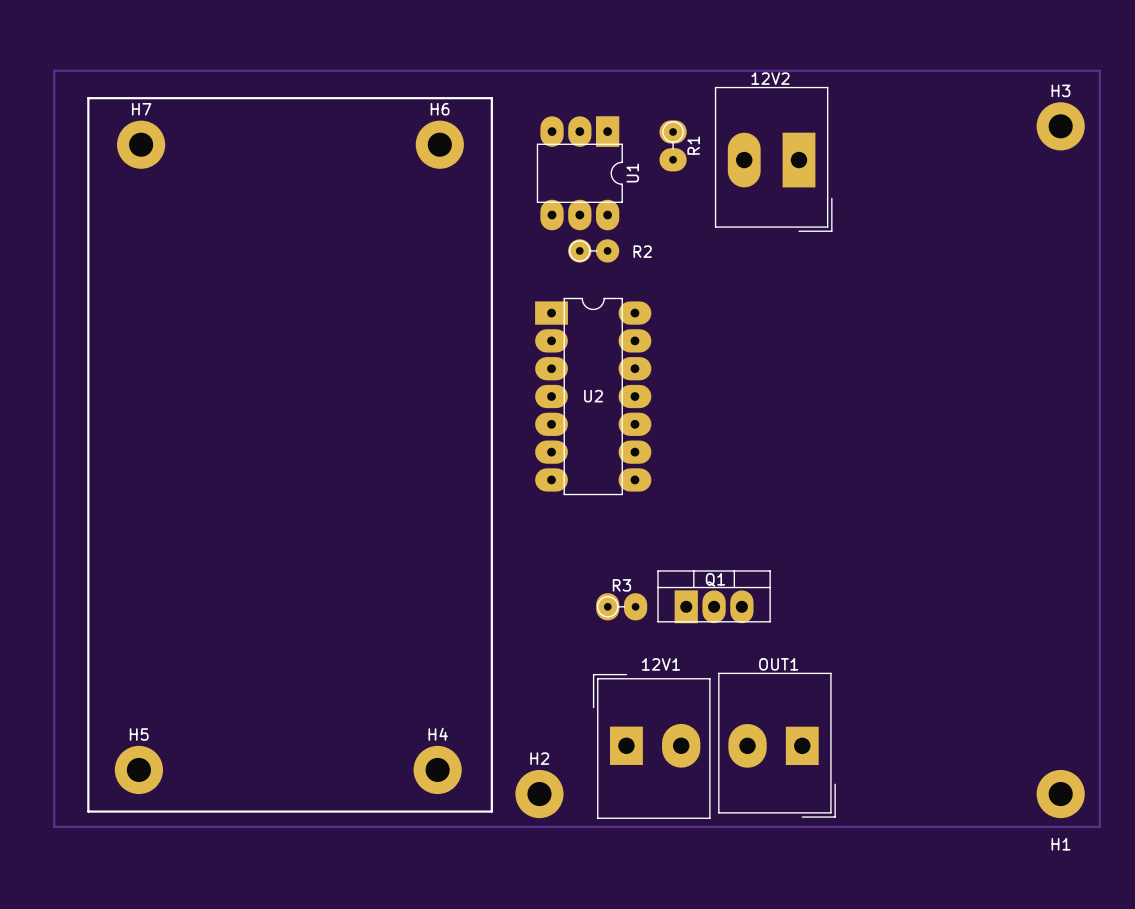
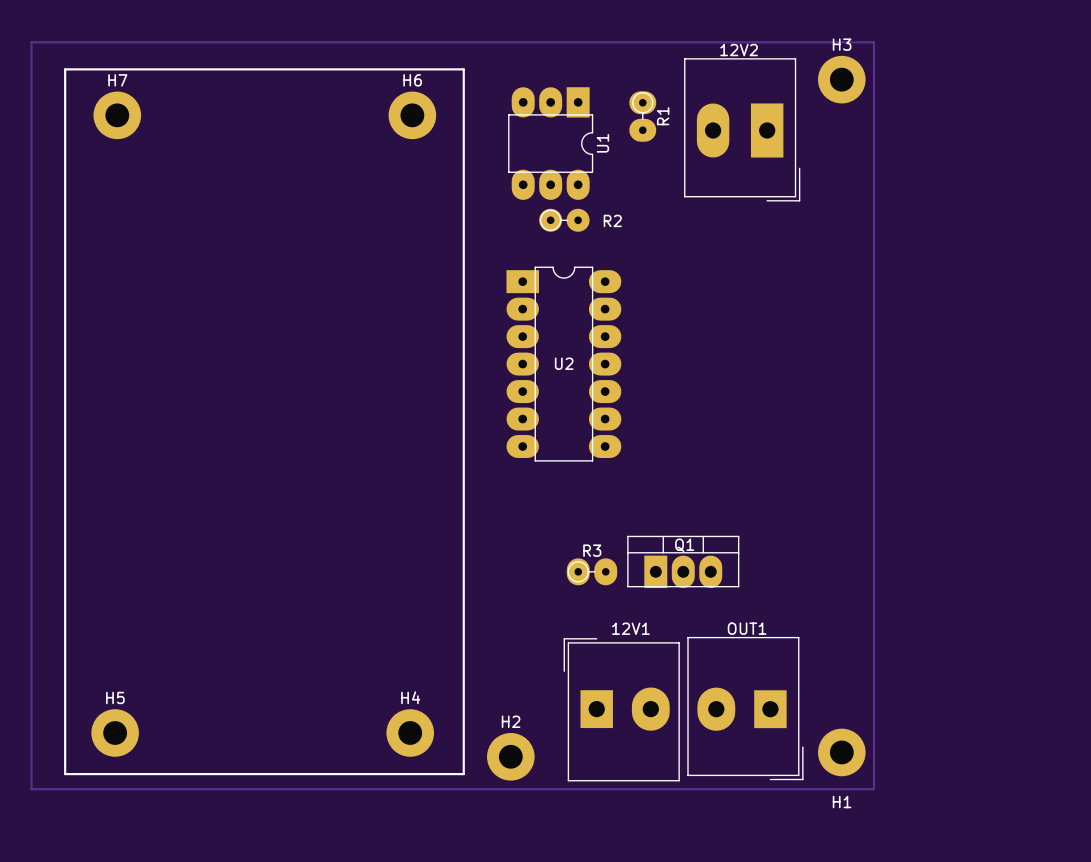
track: (907, 70) (1099, 70) (1099, 826) (907, 826) -> (874, 42) (874, 789)
H3 position: (1060, 126) -> (841, 79)
H1 position: (1060, 794) -> (841, 752)

